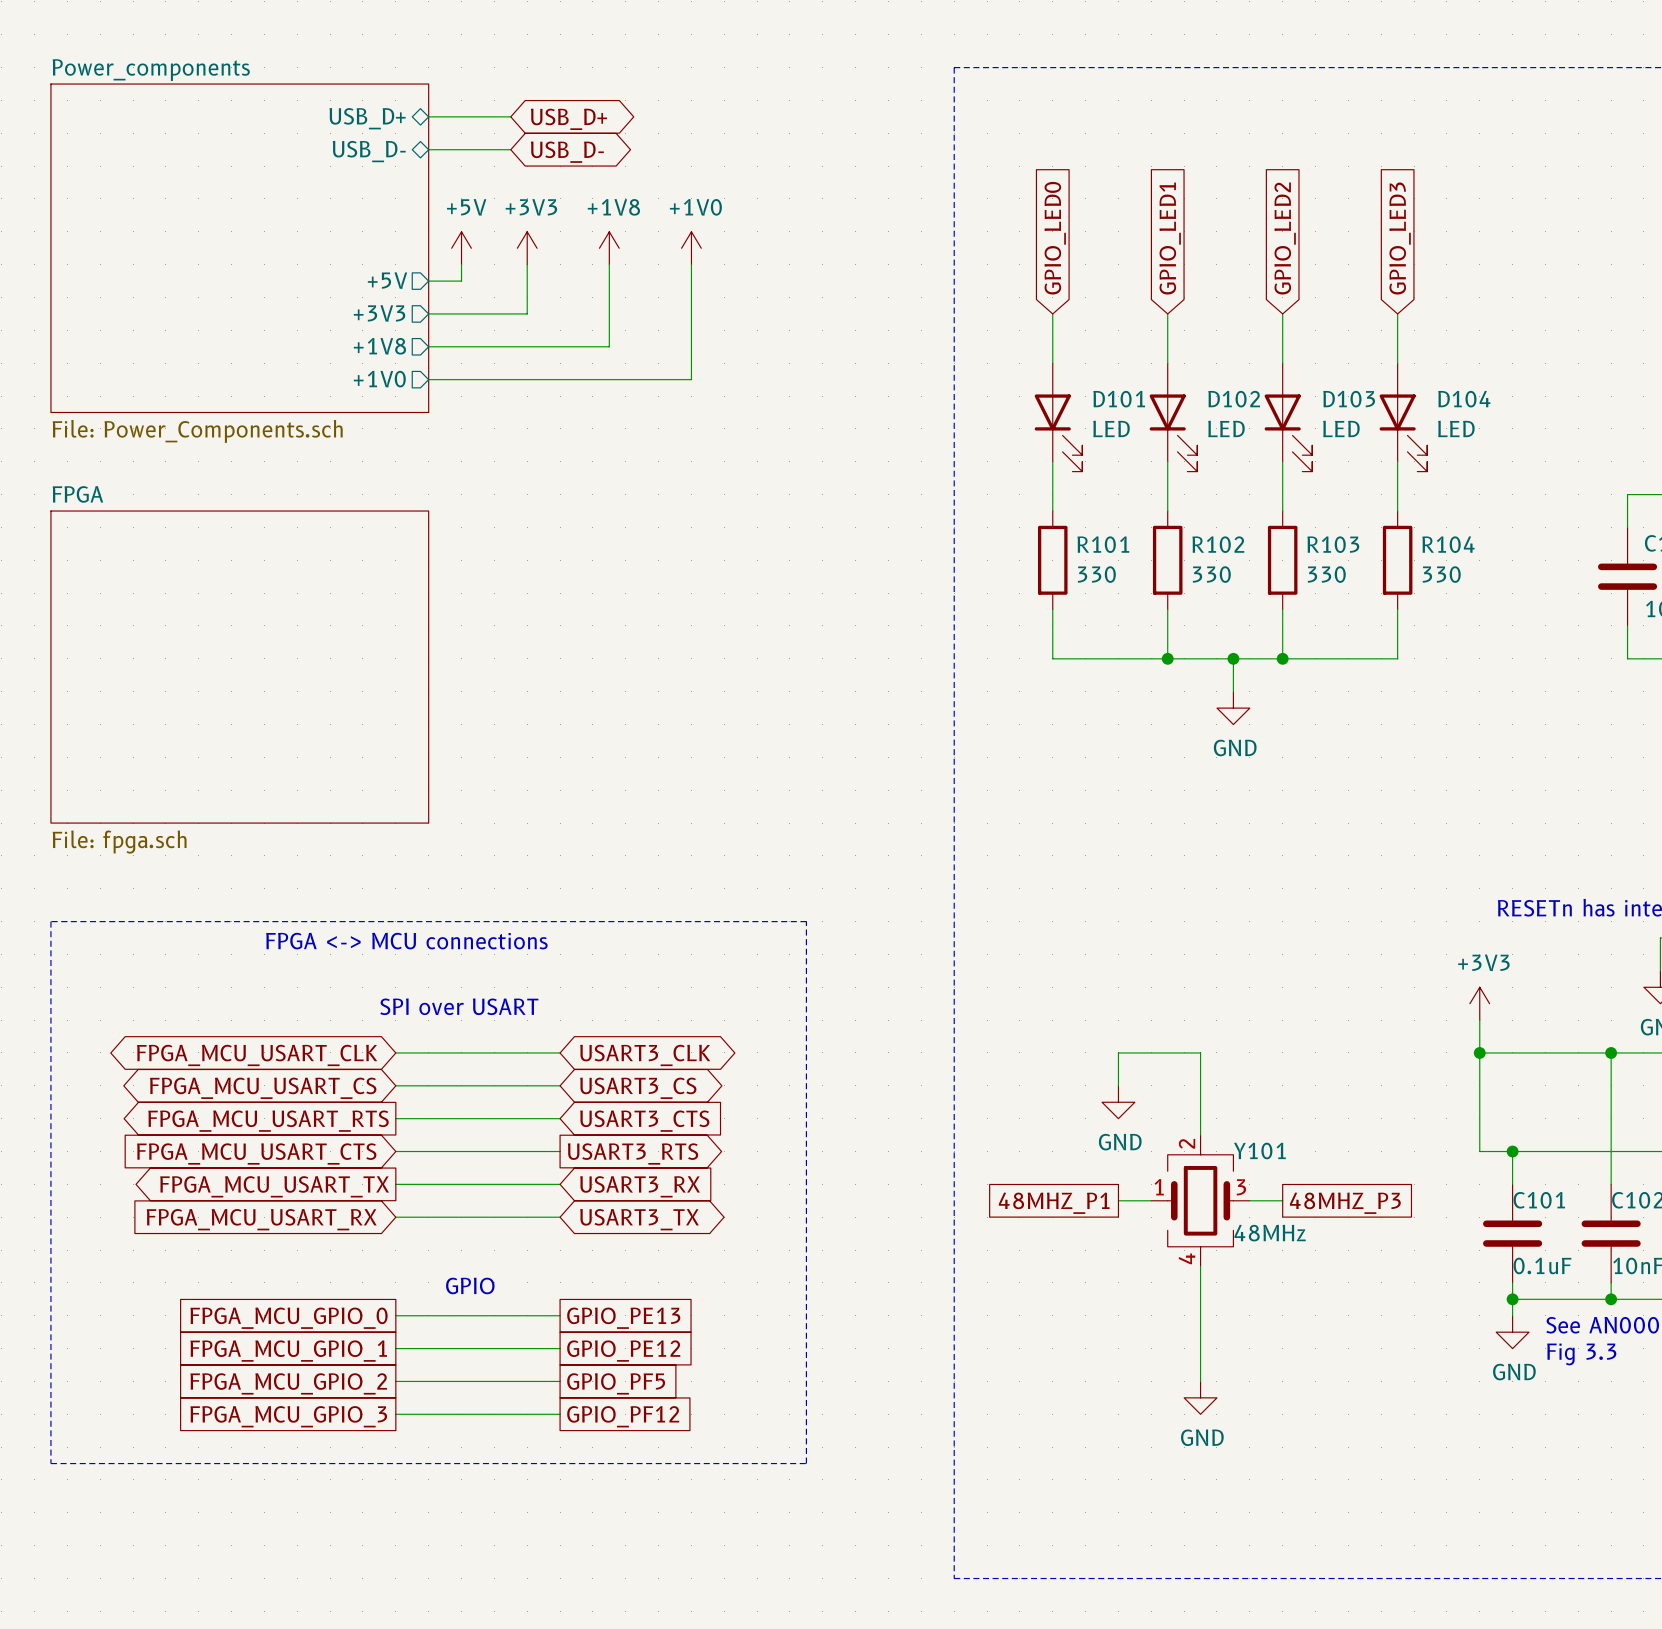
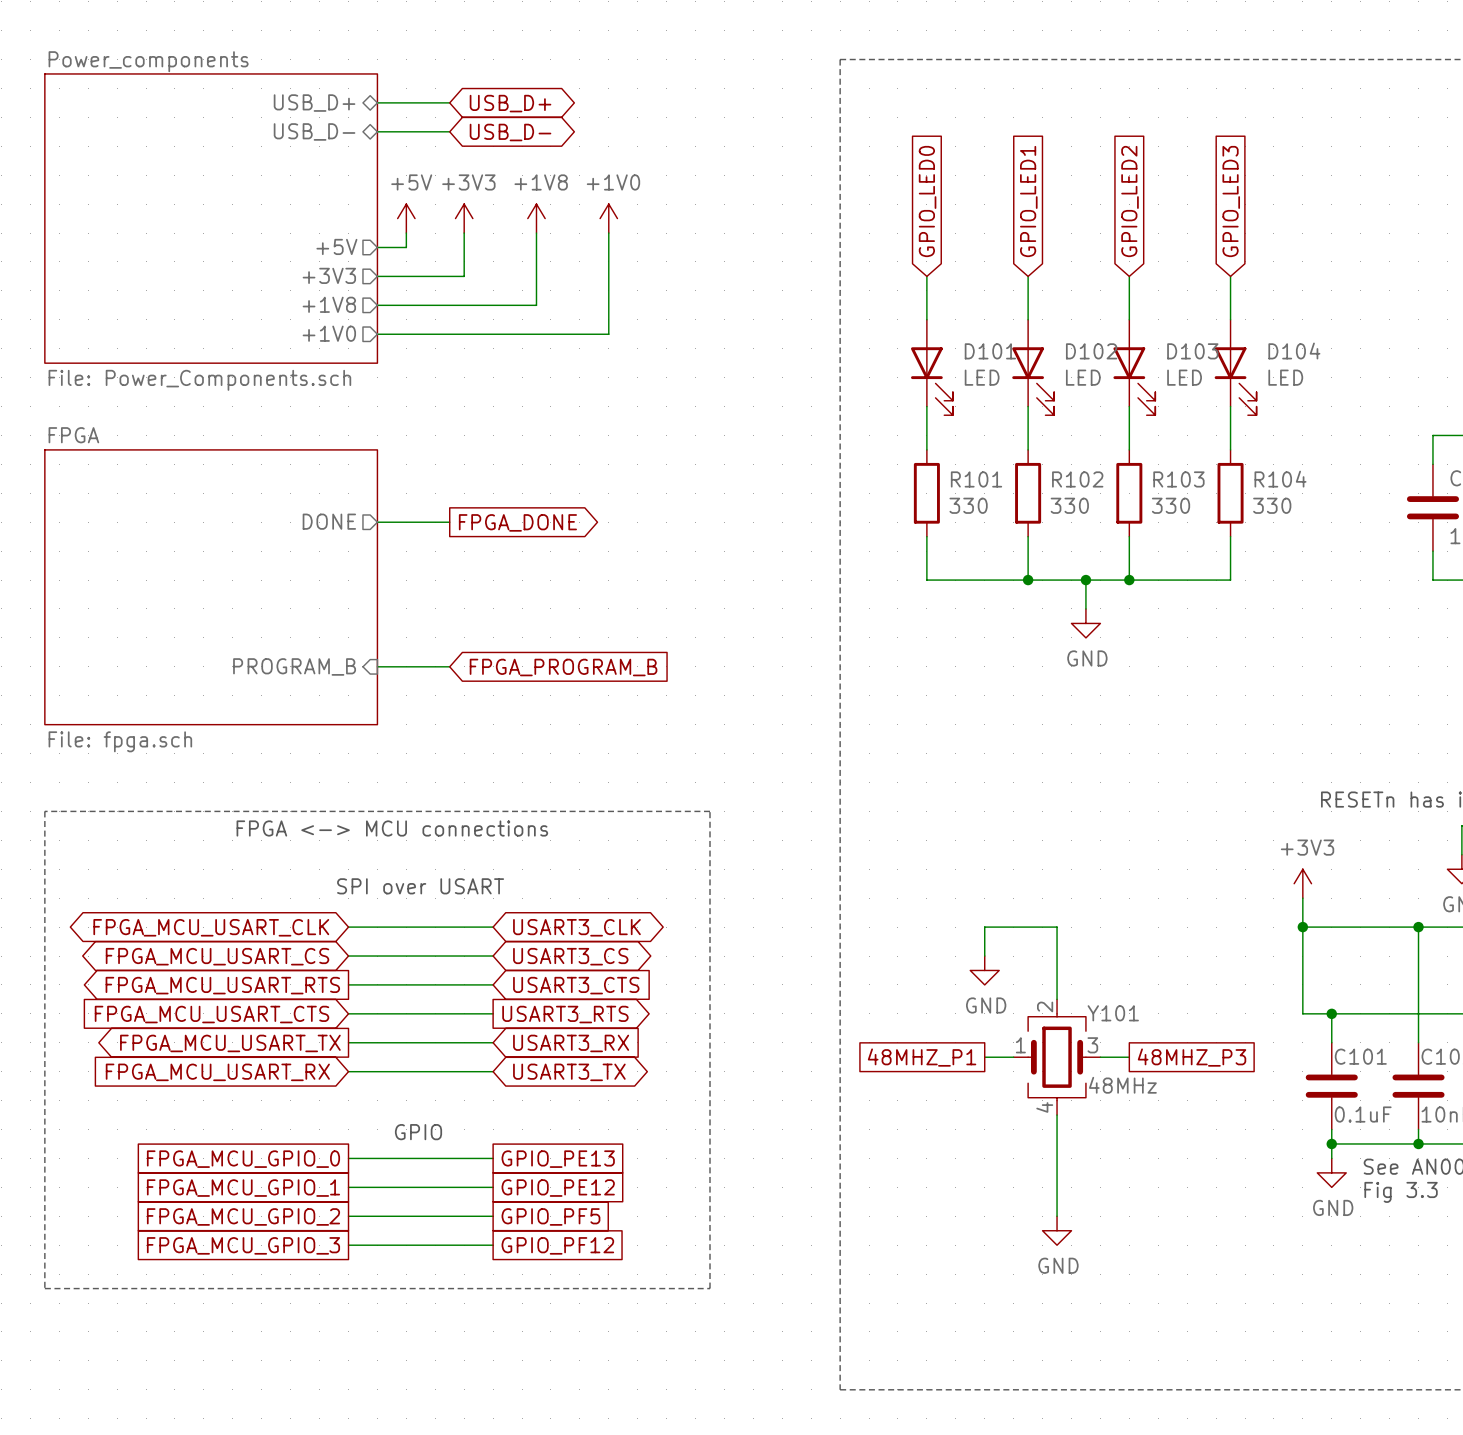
sheet pin: none -> DONE (329, 521)
wire: none -> (377, 522) (449, 522)
global label: none -> FPGA_DONE (517, 522)
wire: none -> (377, 666) (449, 666)
sheet pin: none -> PROGRAM_B (294, 666)
global label: none -> FPGA_PROGRAM_B (563, 667)

